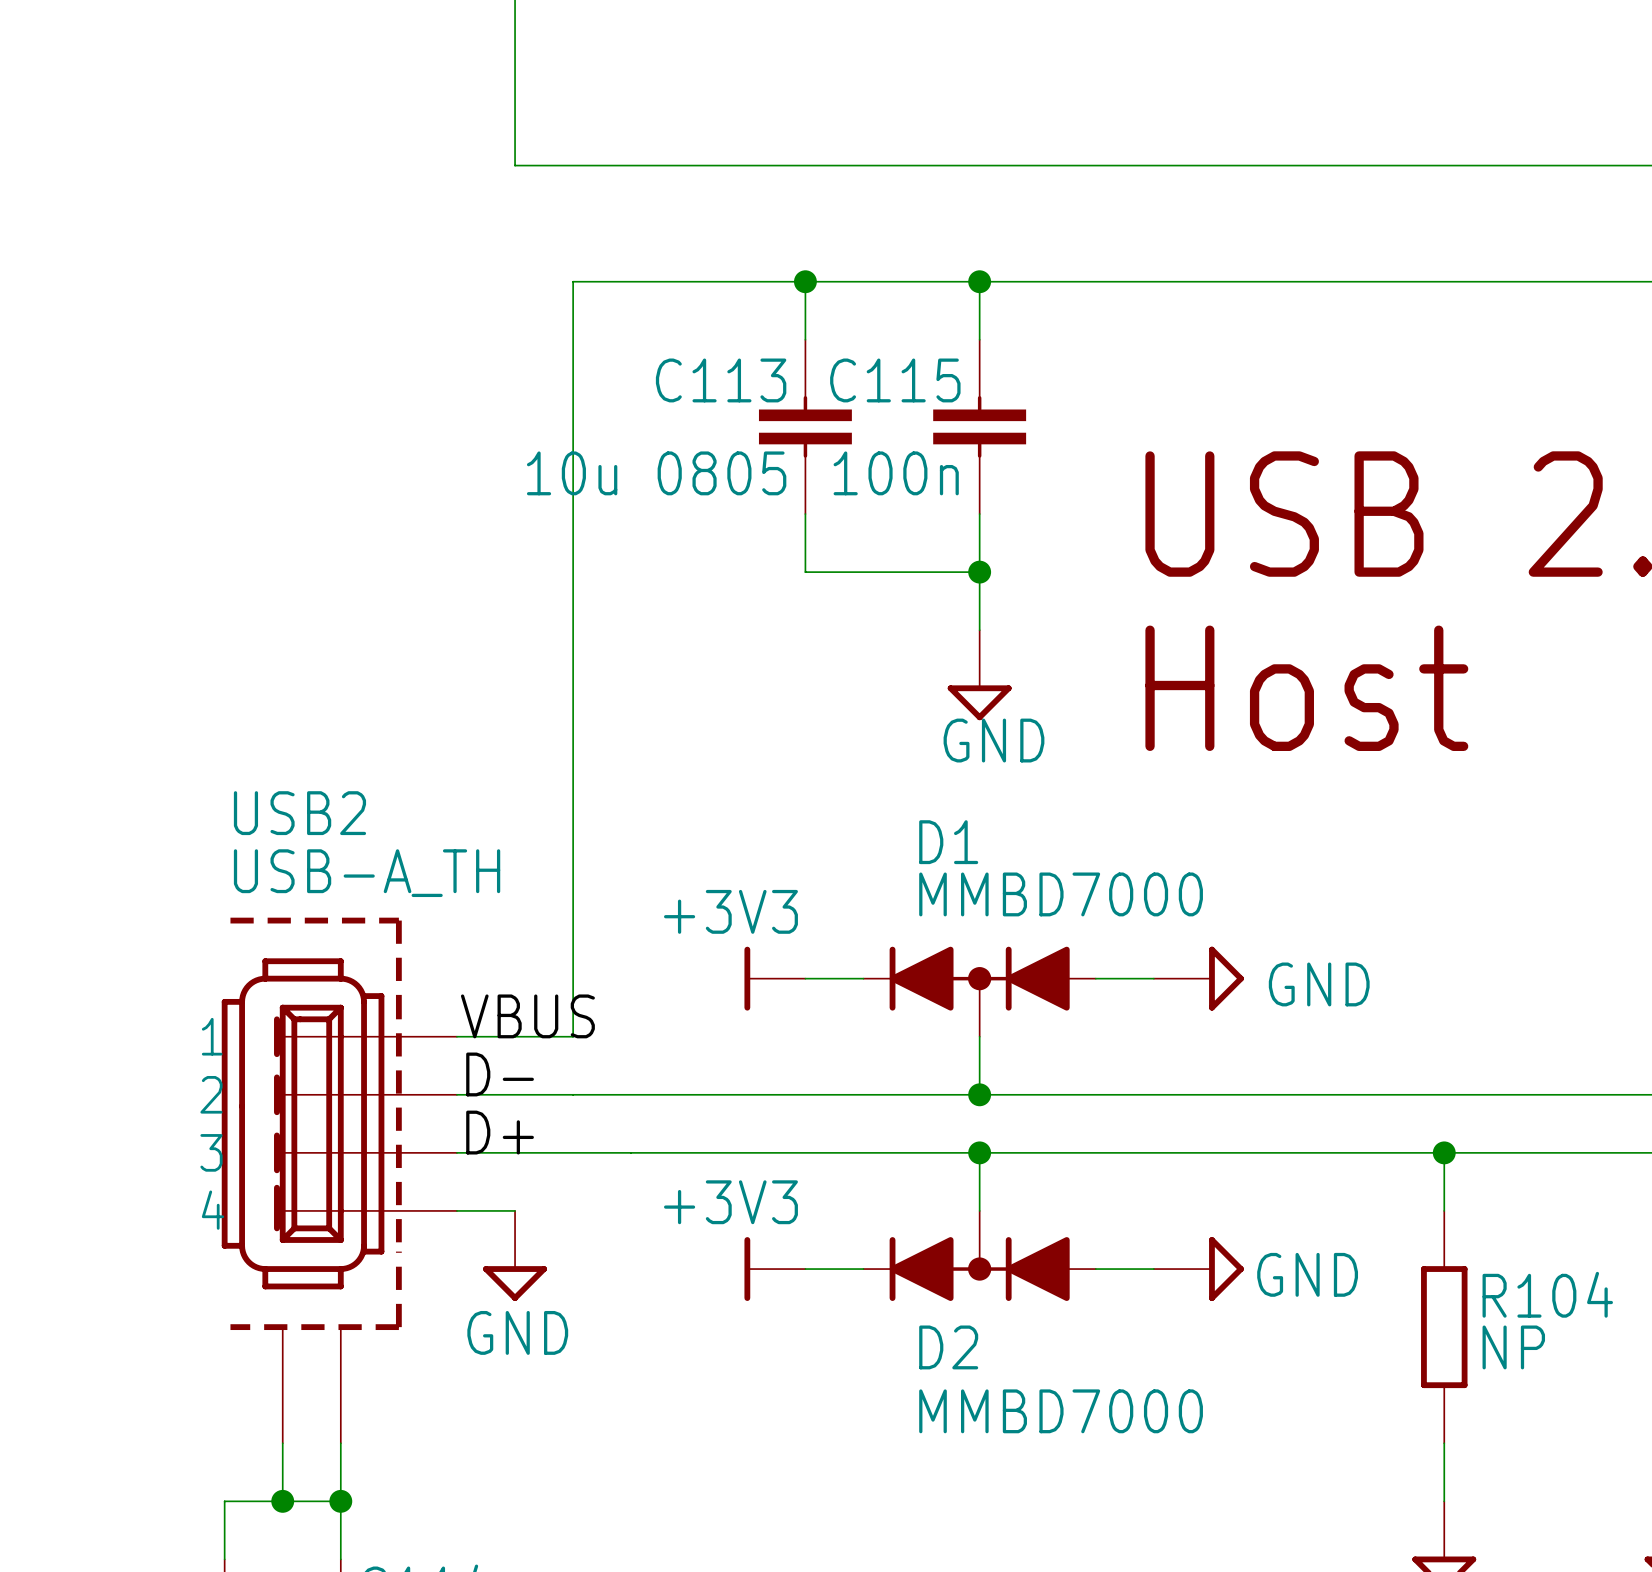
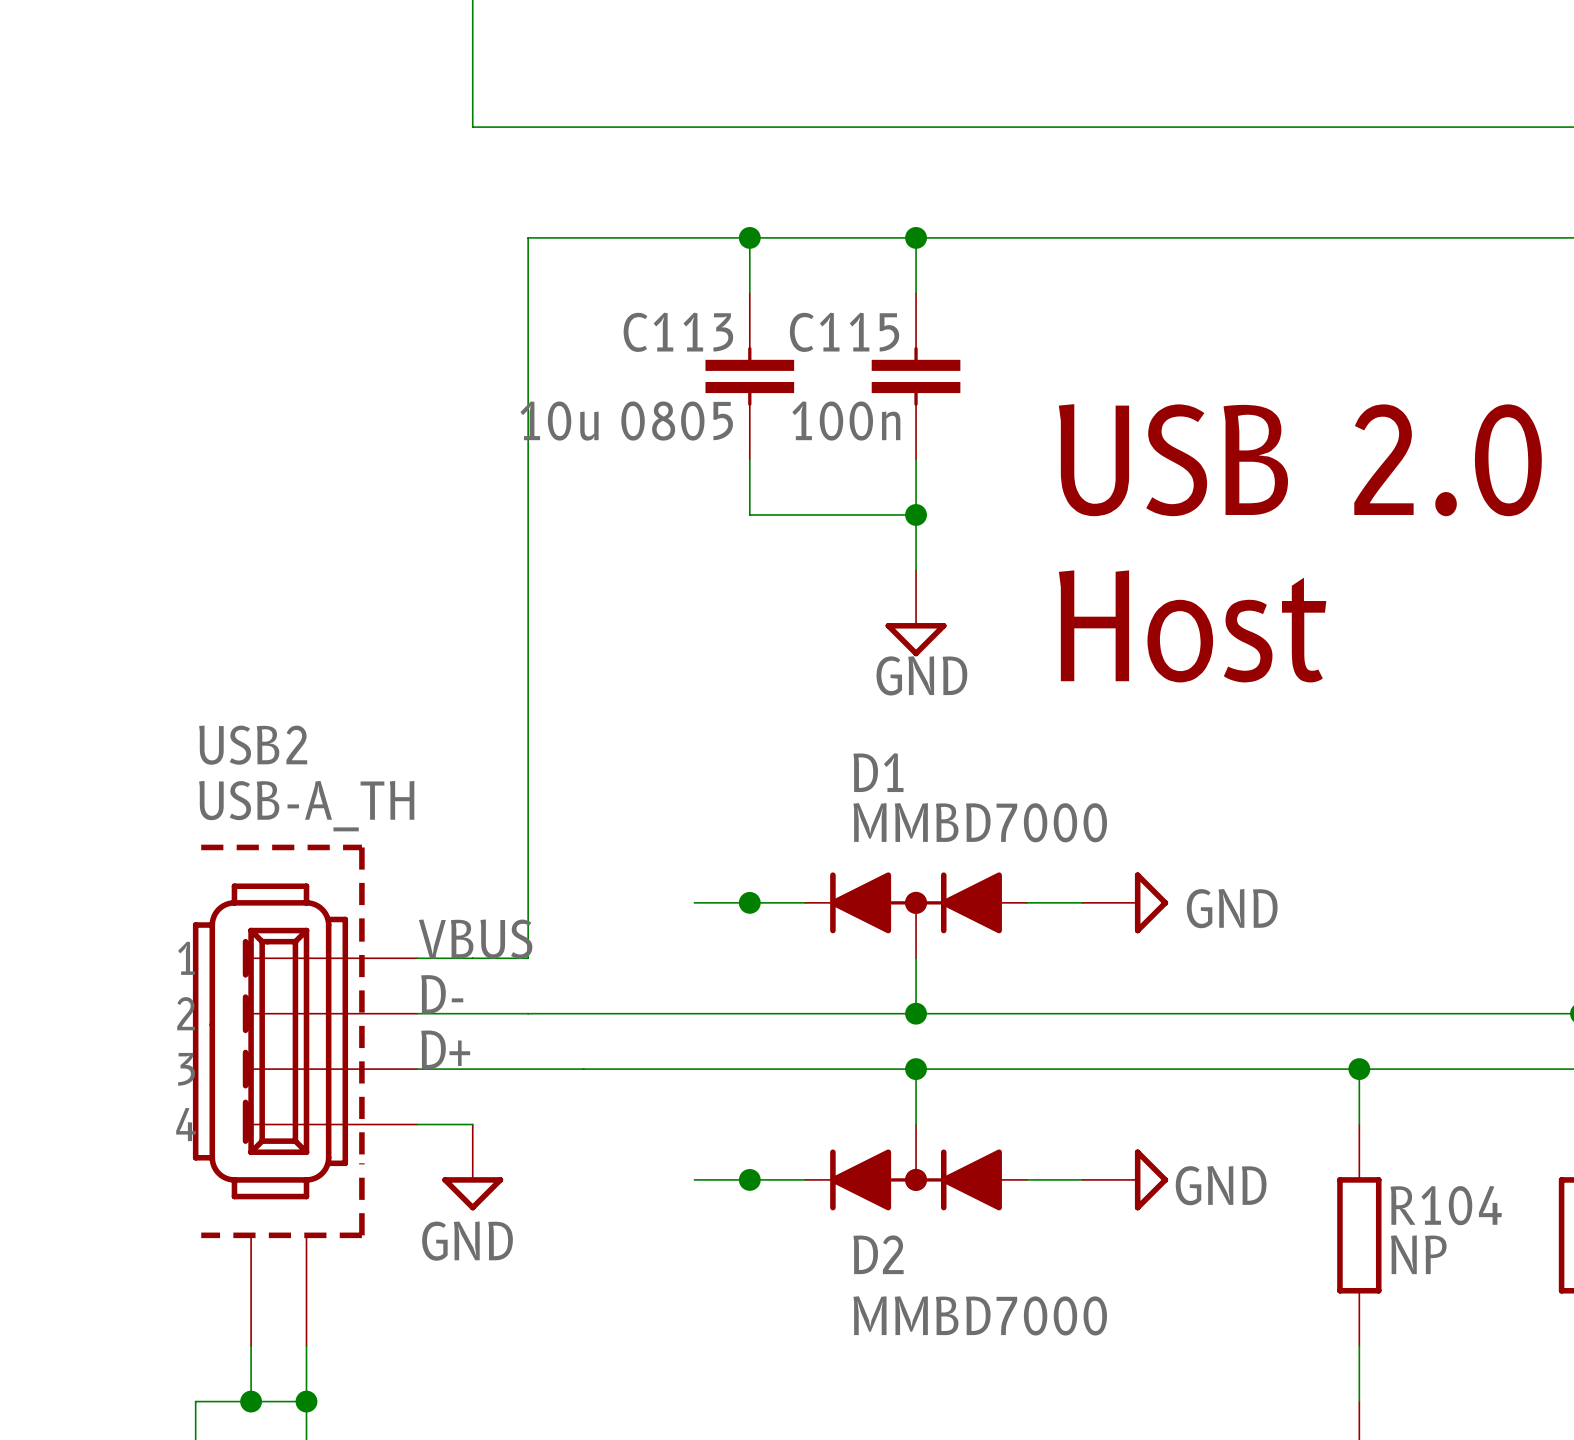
power symbol: +3V3 (774, 978) -> none
junction: none -> (749, 902)
power symbol: +3V3 (774, 1269) -> none
junction: none -> (749, 1179)

